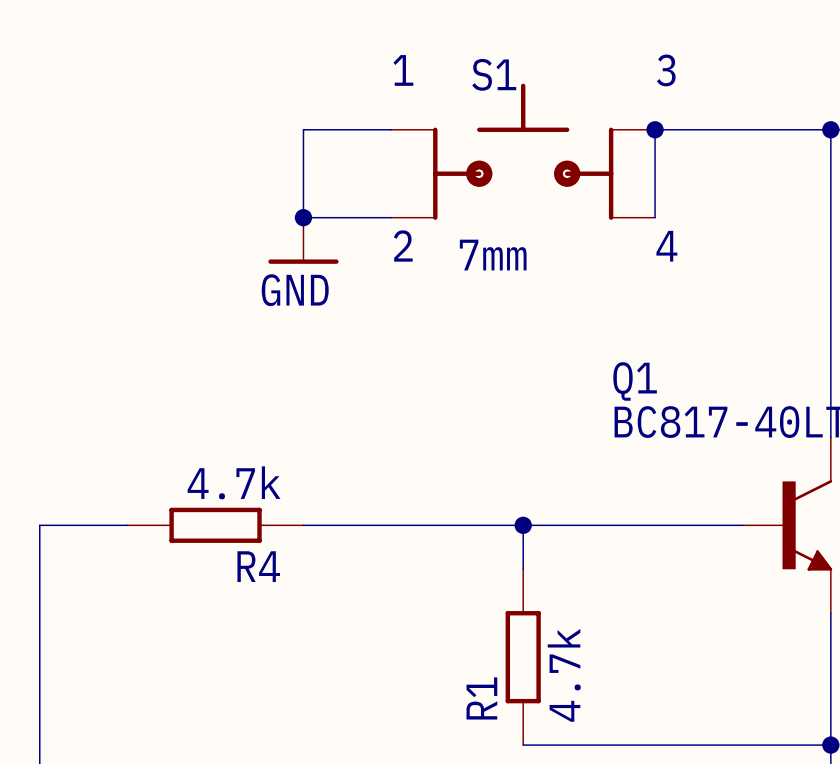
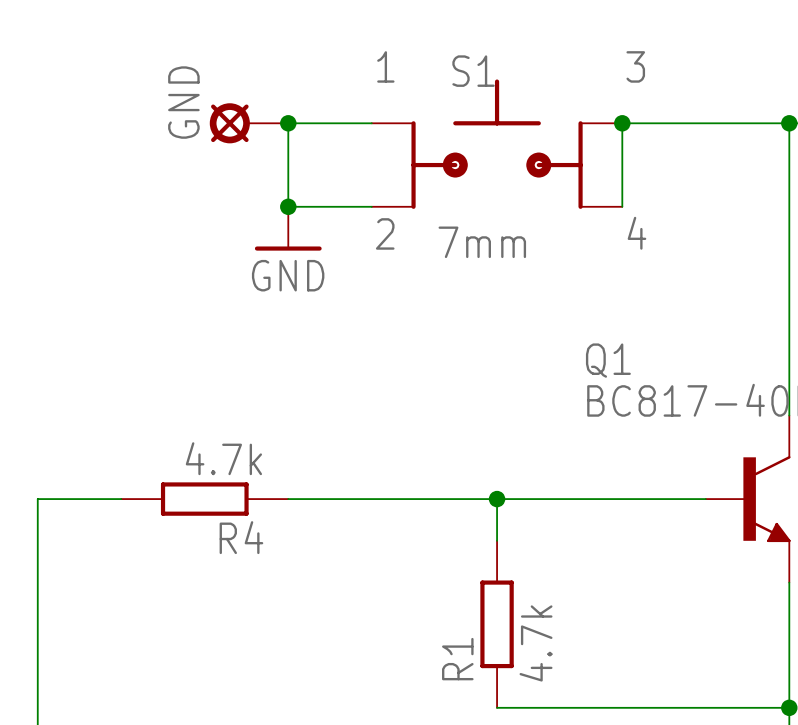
GND: none -> (249, 123)
junction: none -> (288, 123)

